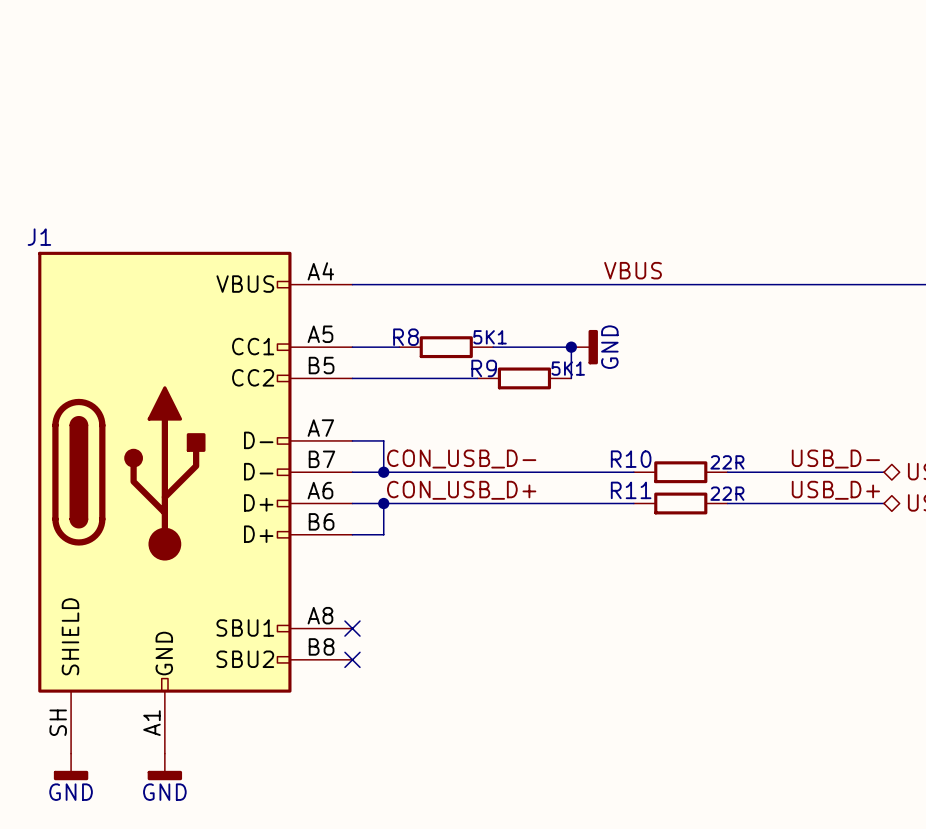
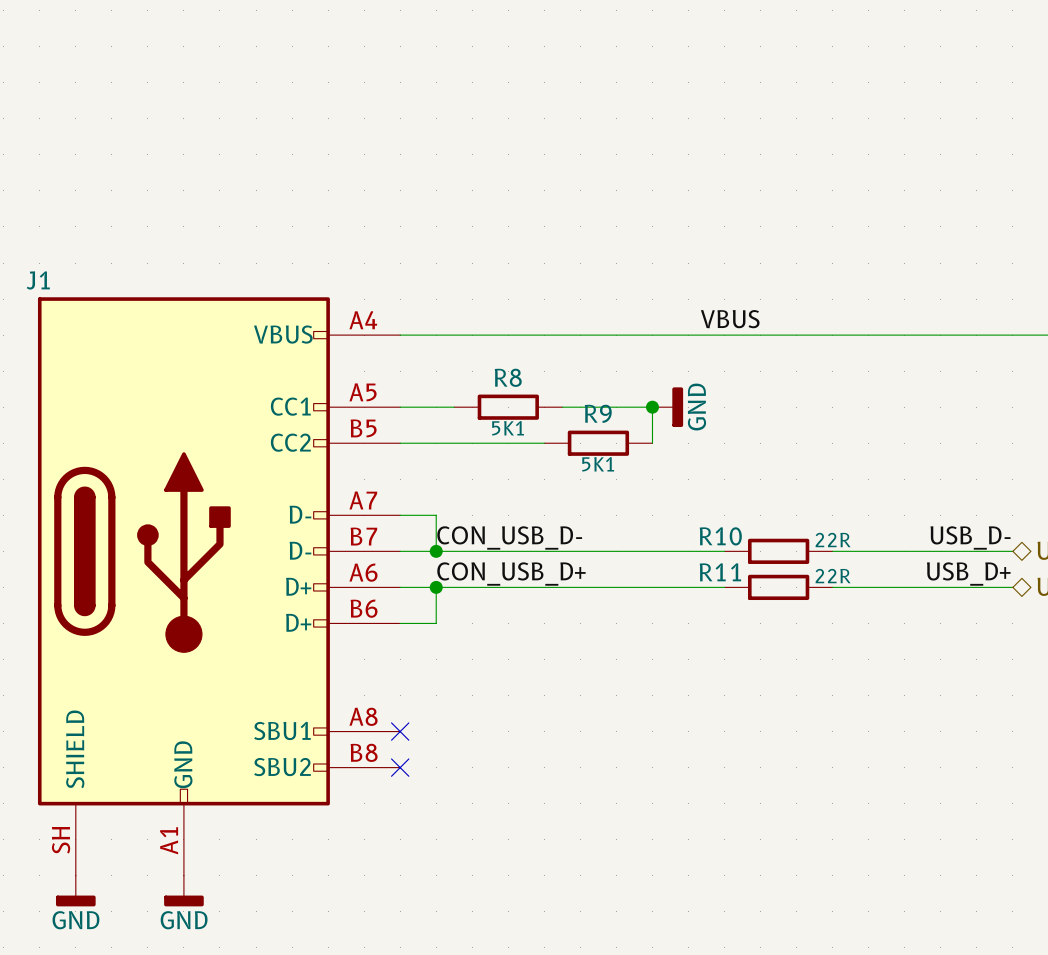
R8 name position: R8 (406, 337) -> R8 (508, 377)
R8 value position: 5K1 (490, 337) -> 5K1 (508, 428)
R9 name position: R9 (484, 368) -> R9 (598, 413)
R9 value position: 5K1 (568, 368) -> 5K1 (598, 464)

